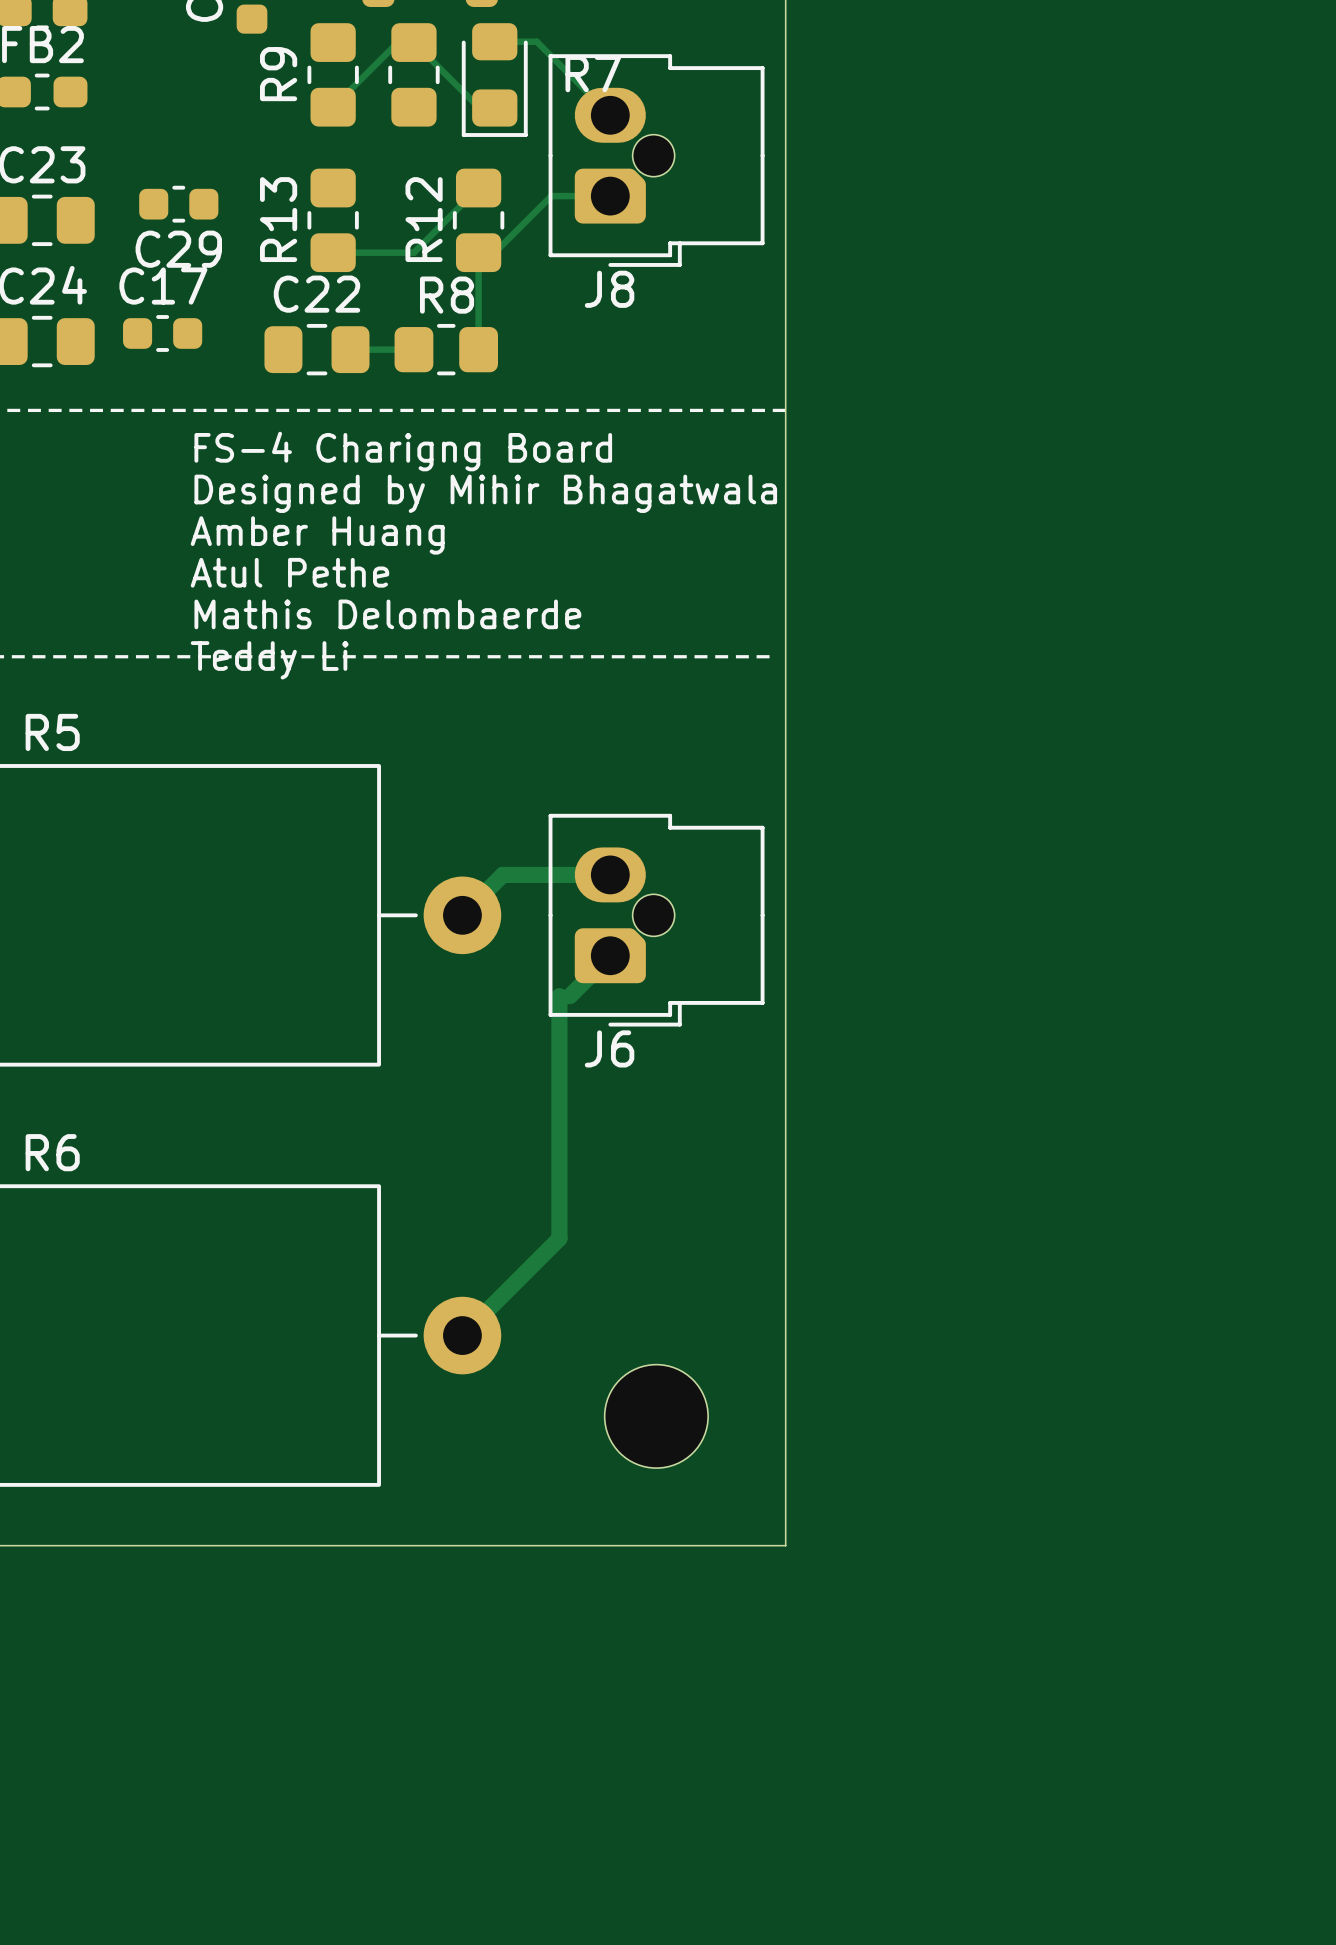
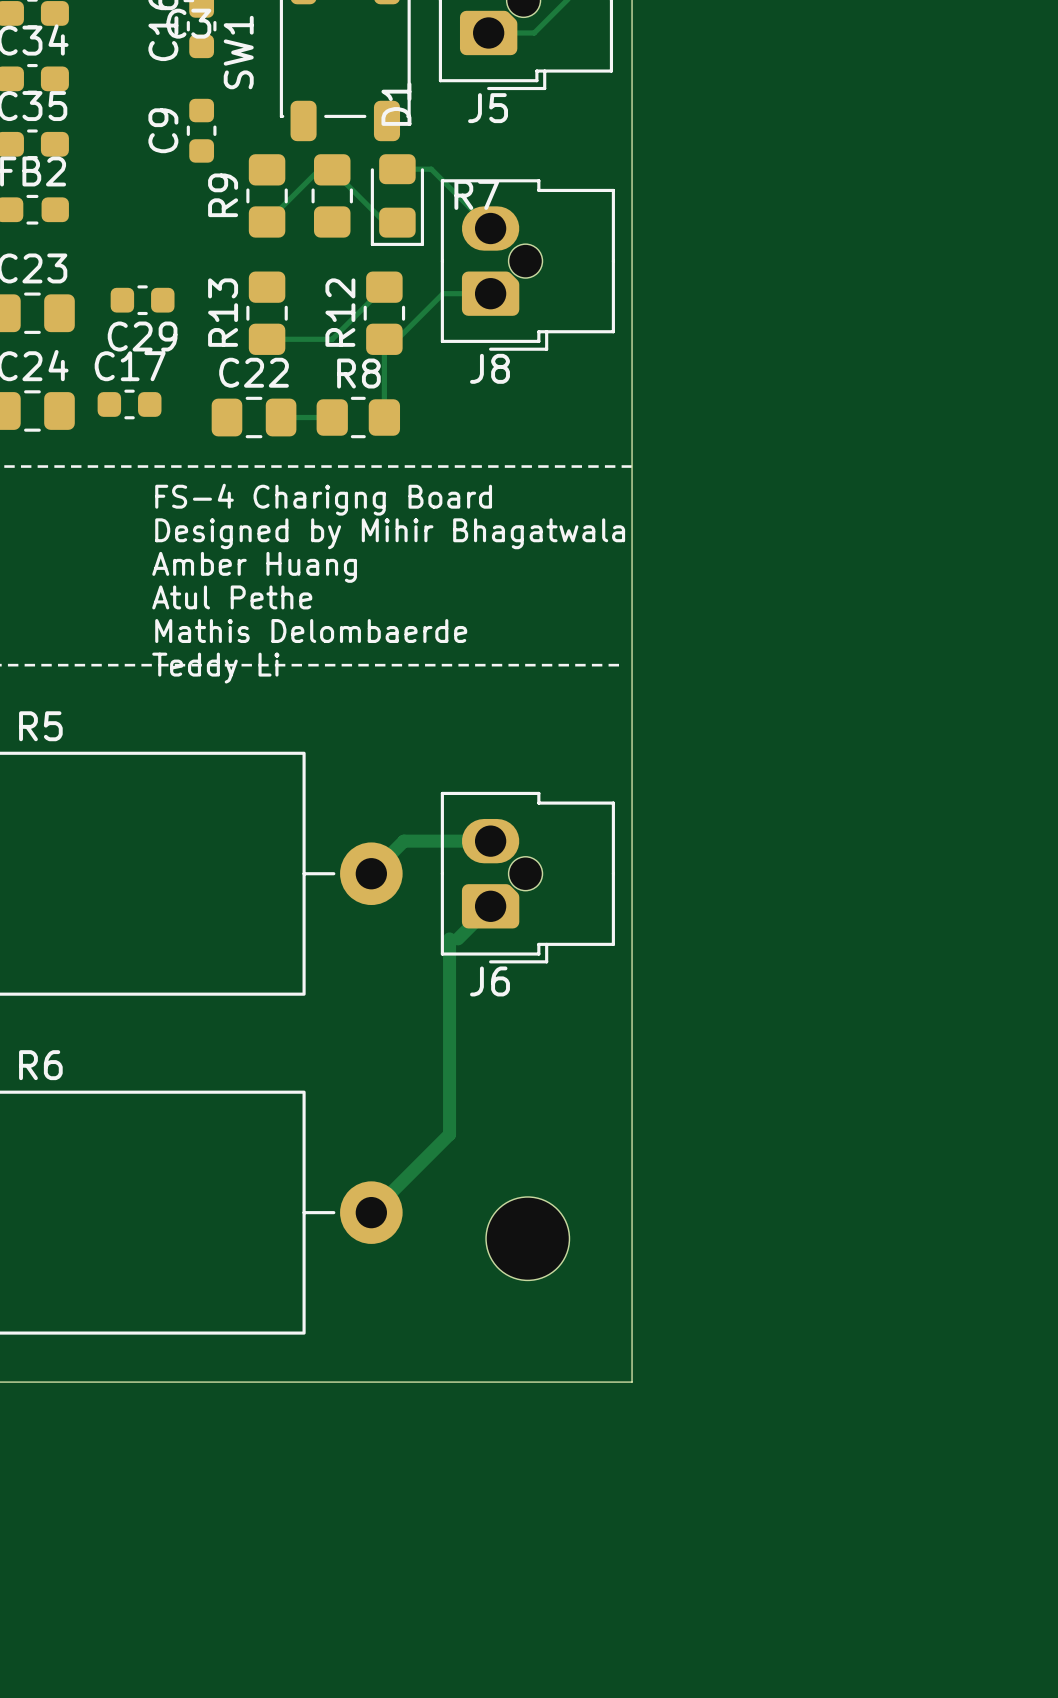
part position: (656, 1416) -> (527, 1238)

